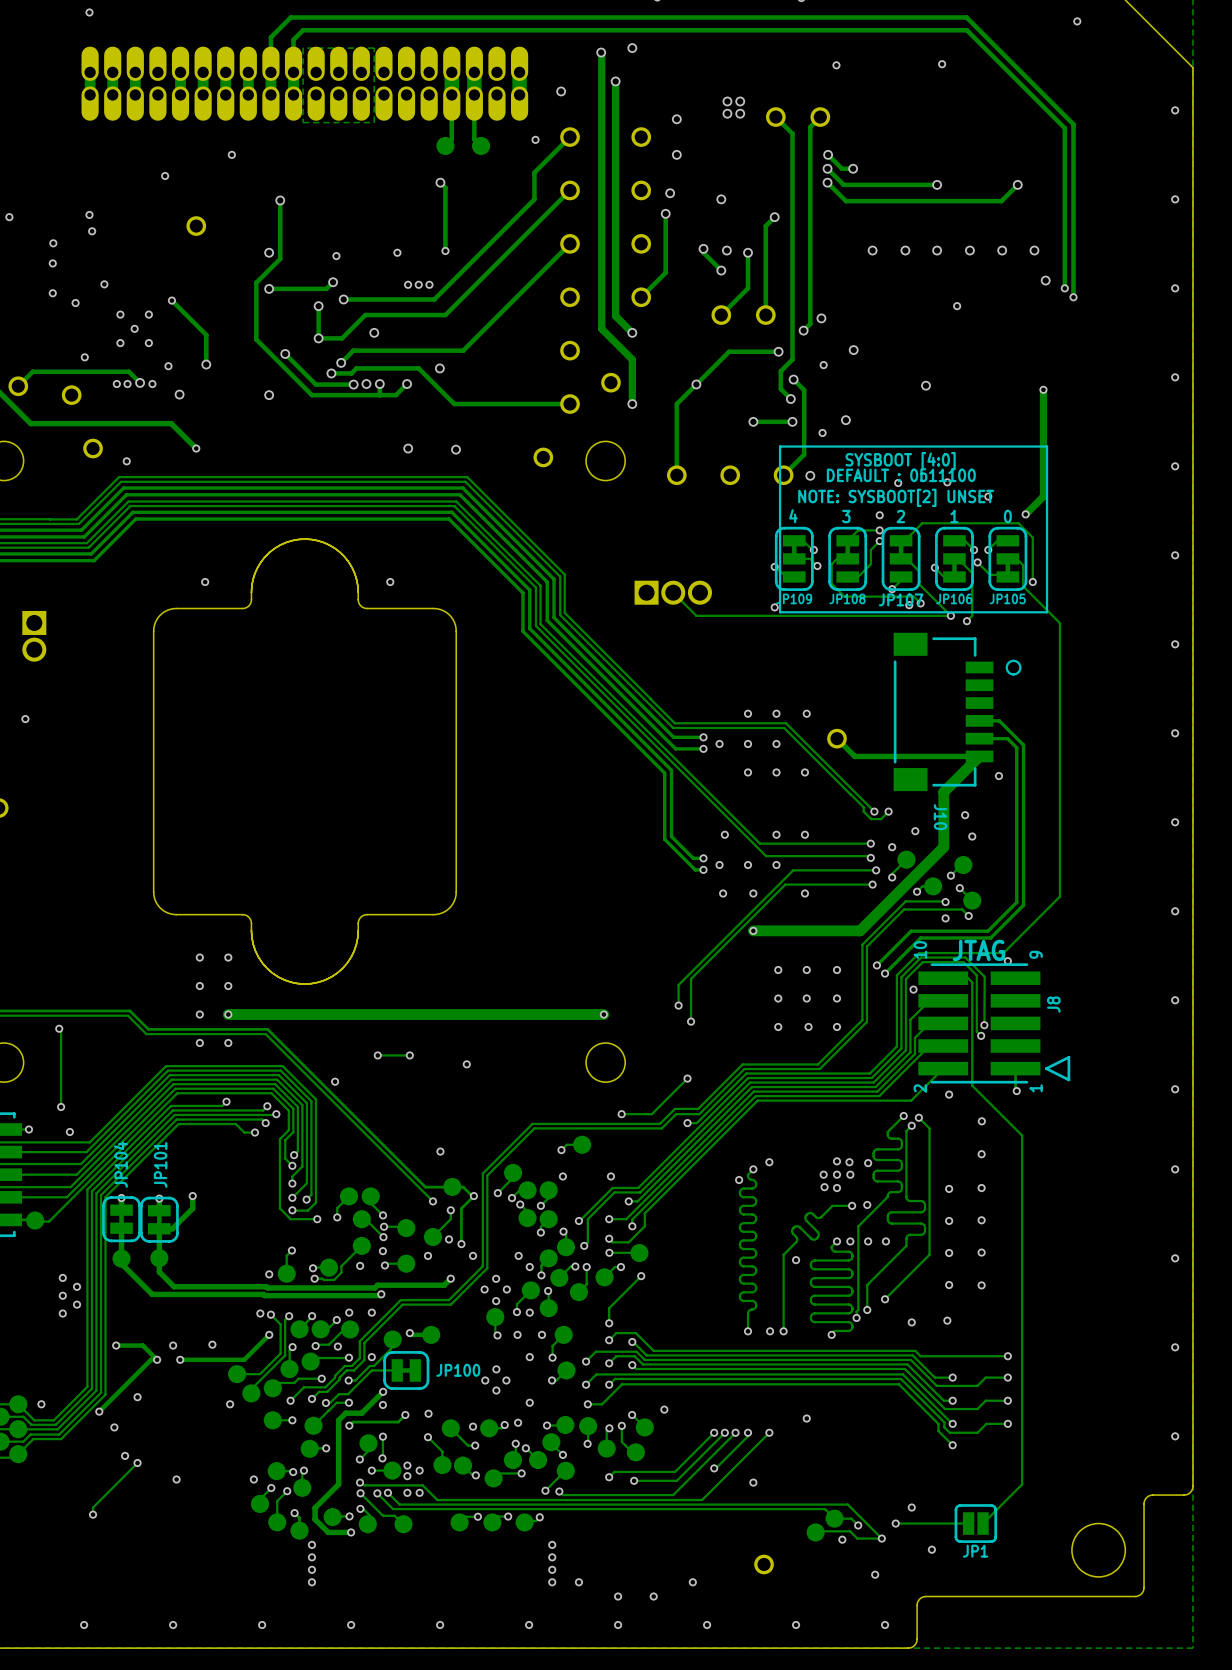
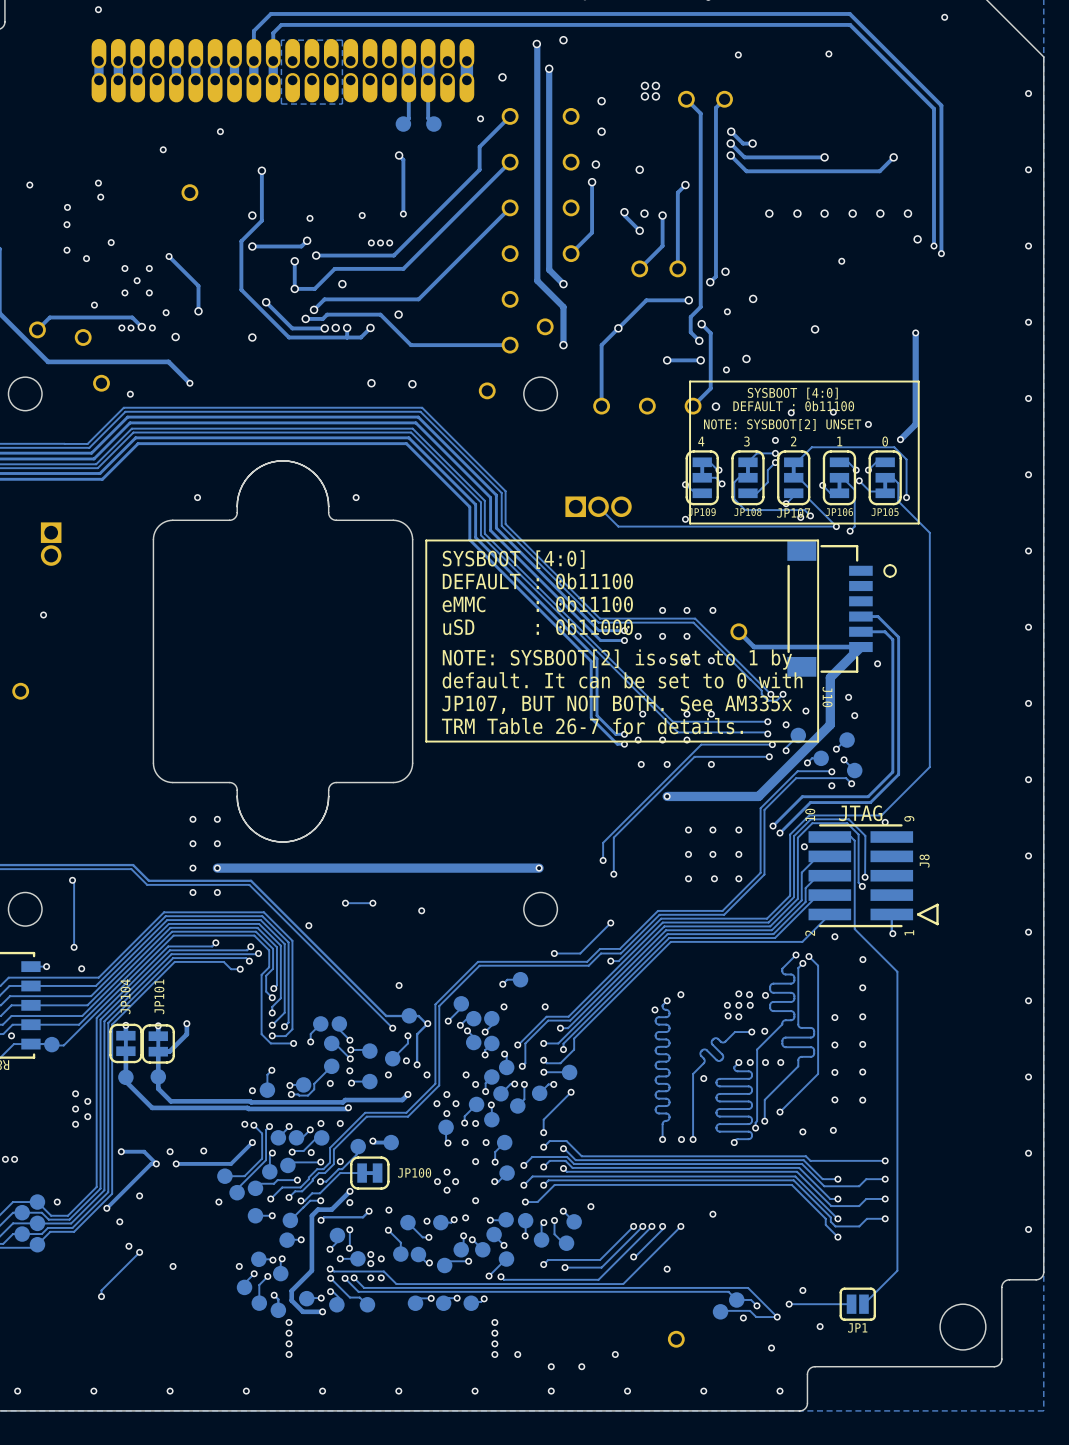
line: none -> (818, 540) (818, 741) (426, 741) (426, 540) (818, 540)
text: none -> SYSBOOT [4:0] (513, 559)
text: none -> DEFAULT : 0b11100 (537, 581)
text: none -> eMMC : 0b11100 (537, 604)
text: none -> uSD : 0b11000 (538, 627)
text: none -> NOTE: SYSBOOT[2] is set to 1 by (617, 659)
text: none -> default. It can be set to 0 with (622, 680)
text: none -> JP107, BUT NOT BOTH. See AM335x (617, 704)
text: none -> TRM Table 26-7 for details. (592, 726)

